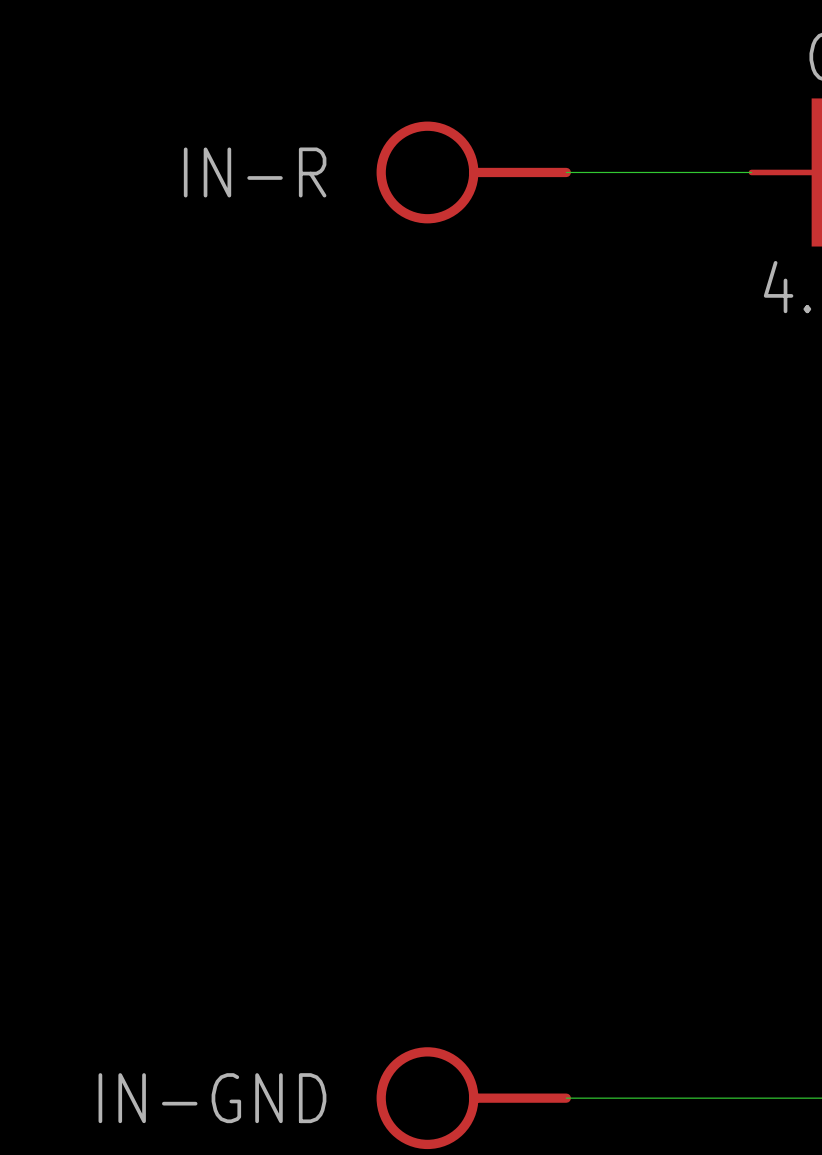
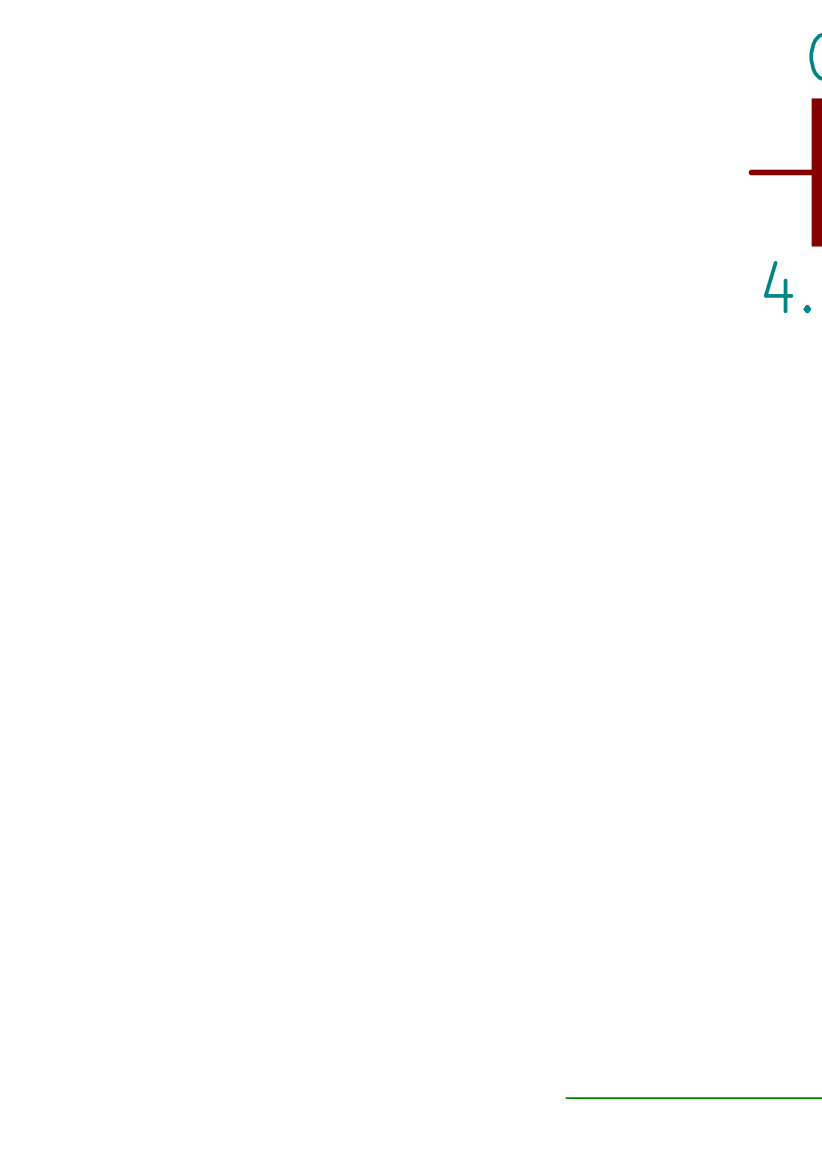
IN-R: (473, 172) -> none
wire: (566, 172) (751, 172) -> none
IN-GND: (473, 1098) -> none

